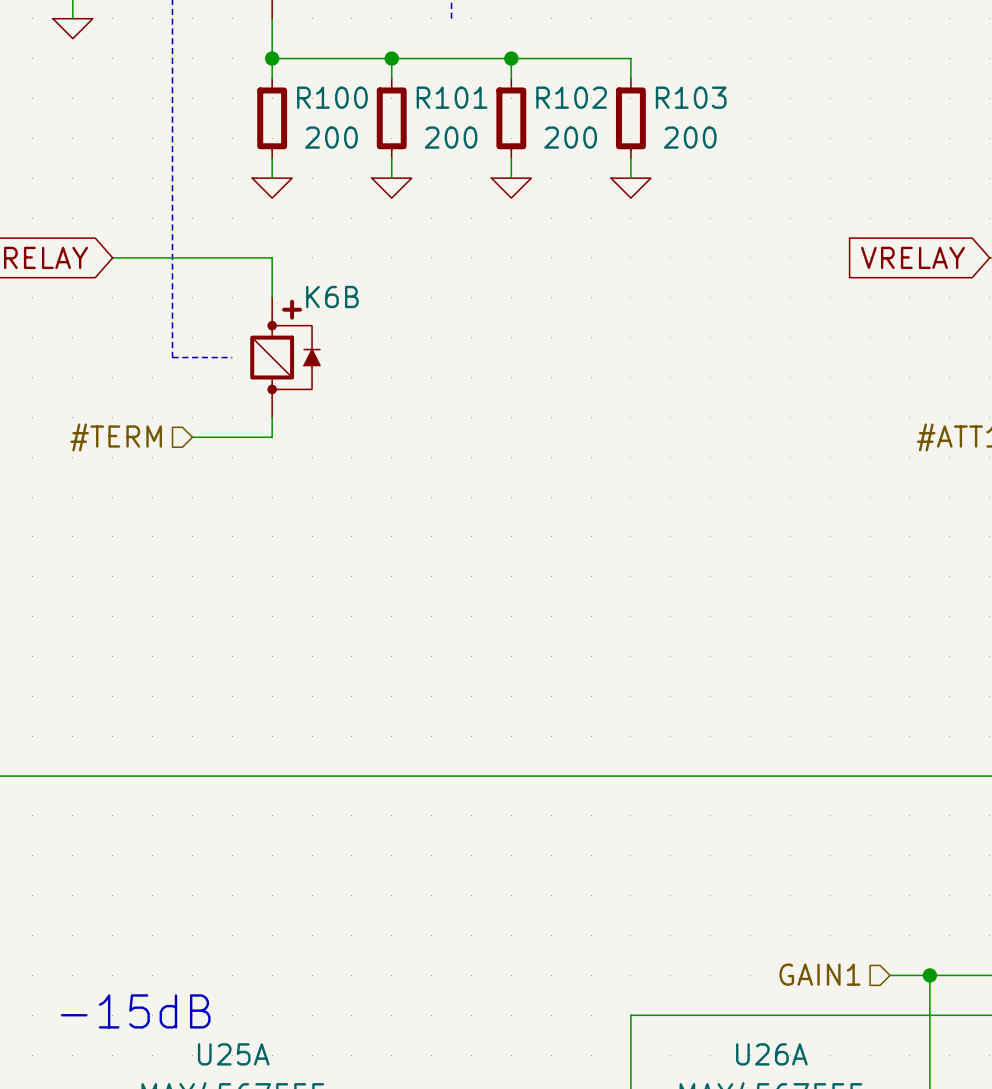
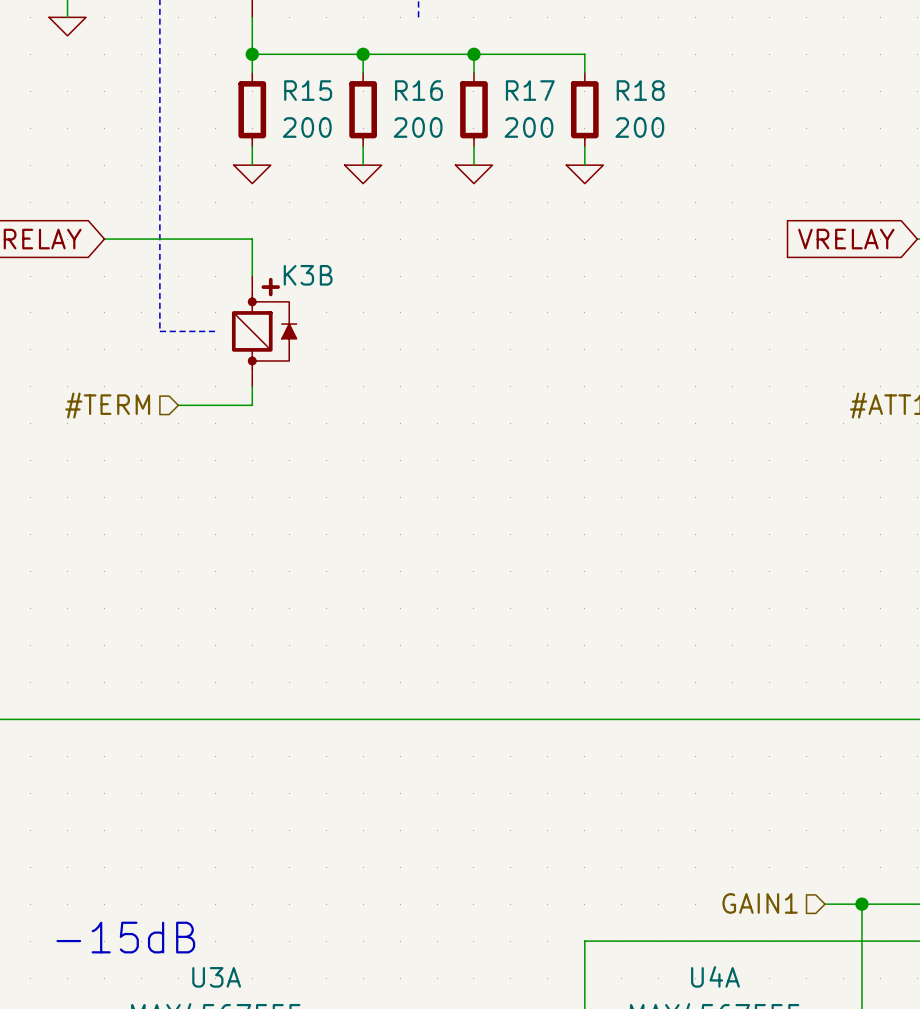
R100 name: R100 (332, 97) -> R15 (308, 90)
R101 name: R101 (452, 97) -> R16 (418, 90)
R102 name: R102 (571, 97) -> R17 (530, 90)
R103 name: R103 (691, 97) -> R18 (640, 90)
K6B name: K6B (332, 297) -> K3B (308, 275)
U25A name: U25A (233, 1054) -> U3A (216, 977)
U26A name: U26A (771, 1054) -> U4A (715, 976)

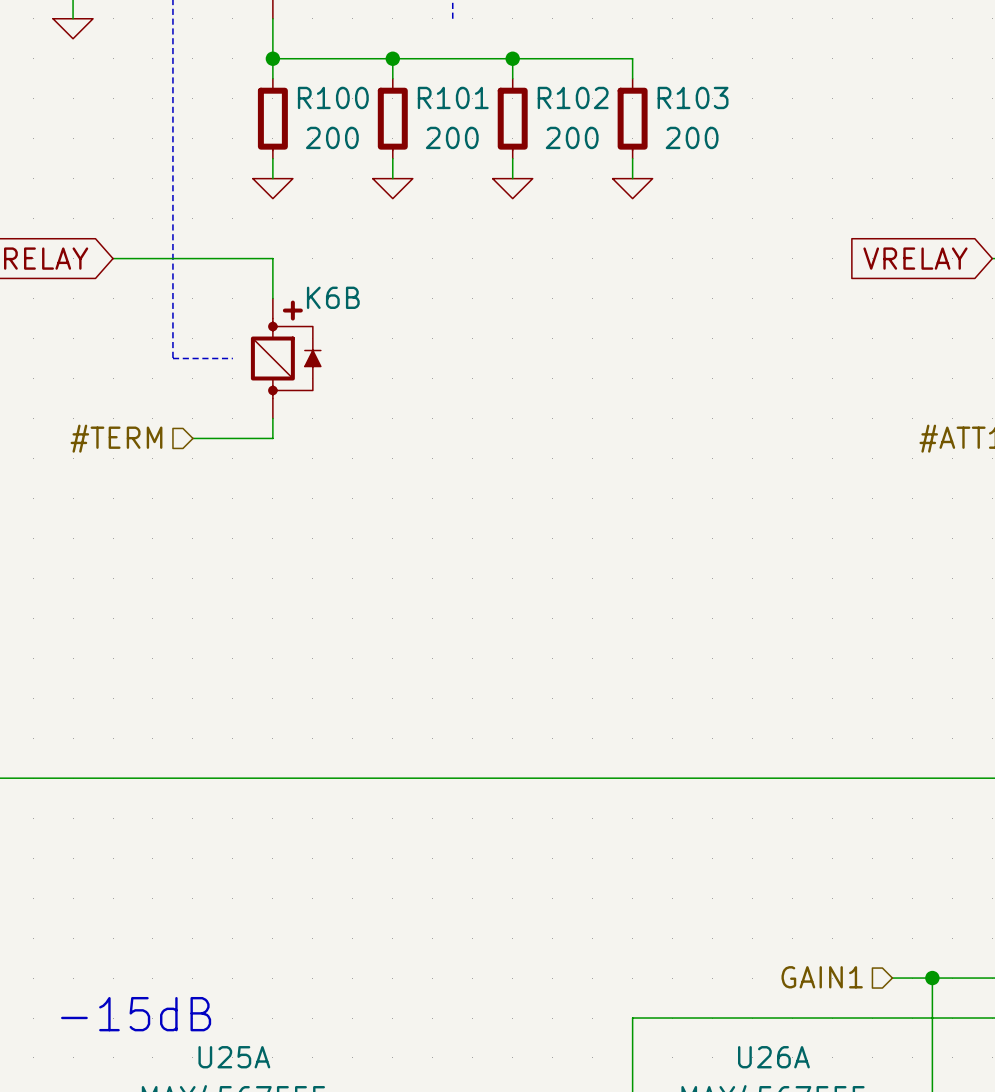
R15 name: R15 (308, 90) -> R100 (333, 97)
R16 name: R16 (418, 90) -> R101 (453, 97)
R17 name: R17 (530, 90) -> R102 (573, 97)
R18 name: R18 (640, 90) -> R103 (693, 97)
K3B name: K3B (308, 275) -> K6B (333, 297)
U4A name: U4A (715, 976) -> U26A (773, 1057)
U3A name: U3A (216, 977) -> U25A (234, 1057)

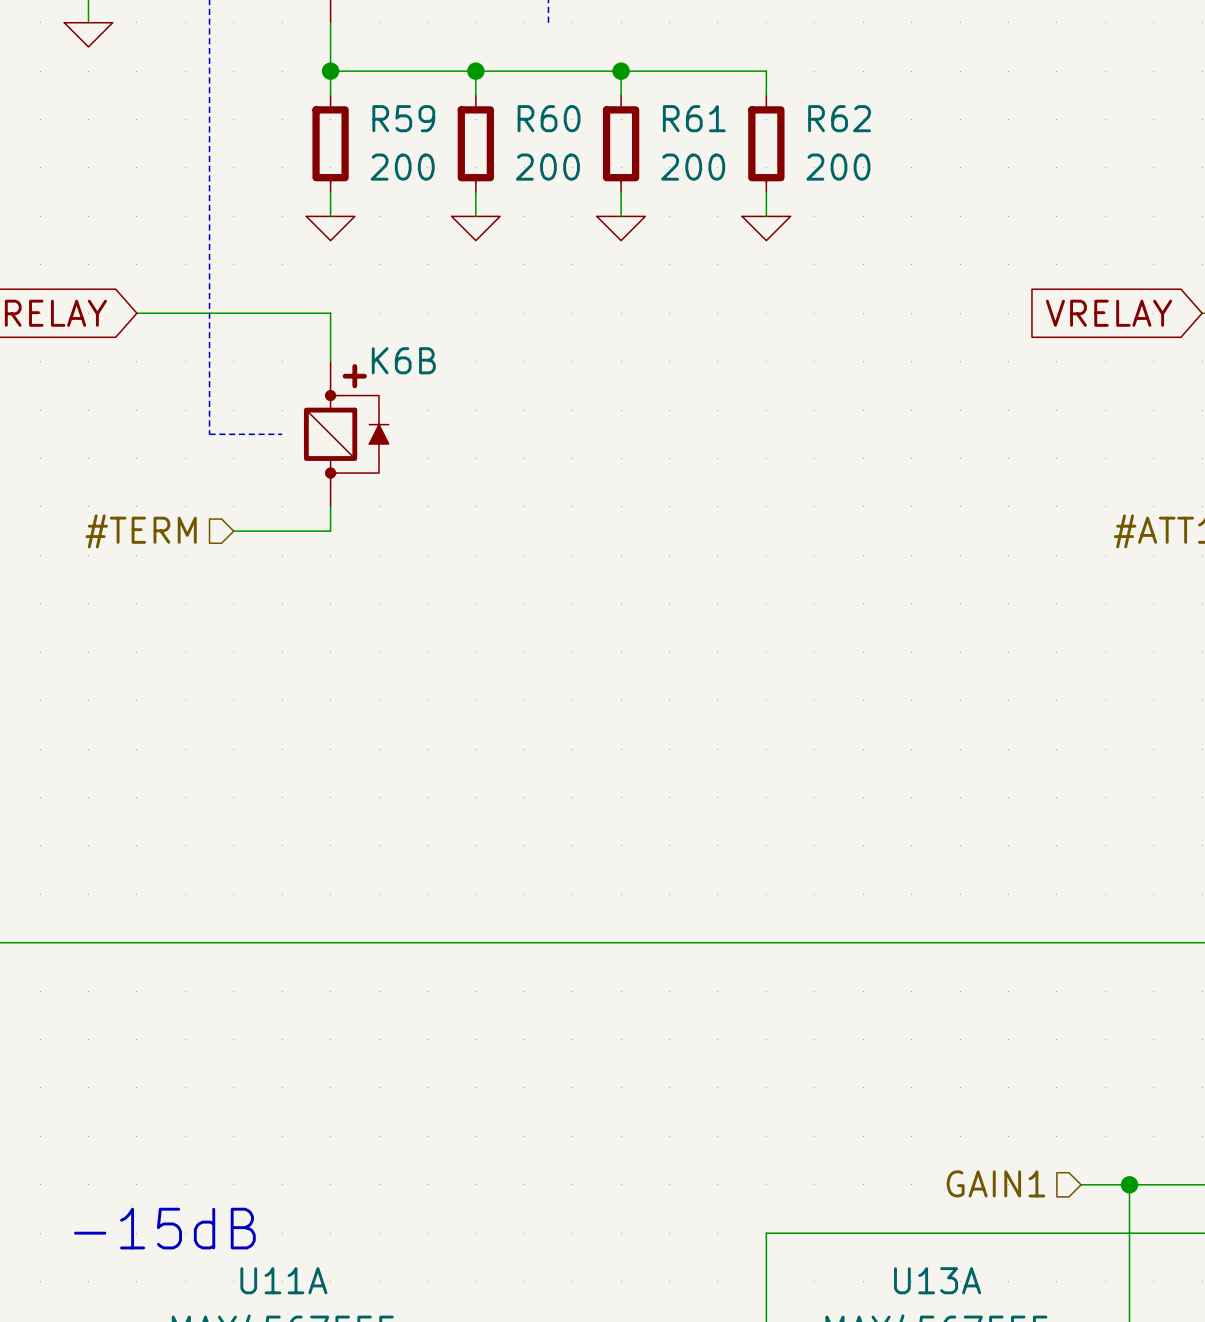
R100 name: R100 (333, 97) -> R59 (403, 118)
R101 name: R101 (453, 97) -> R60 (549, 118)
R102 name: R102 (573, 97) -> R61 (694, 118)
R103 name: R103 (693, 97) -> R62 (839, 118)
U25A name: U25A (234, 1057) -> U11A (283, 1280)
U26A name: U26A (773, 1057) -> U13A (937, 1280)

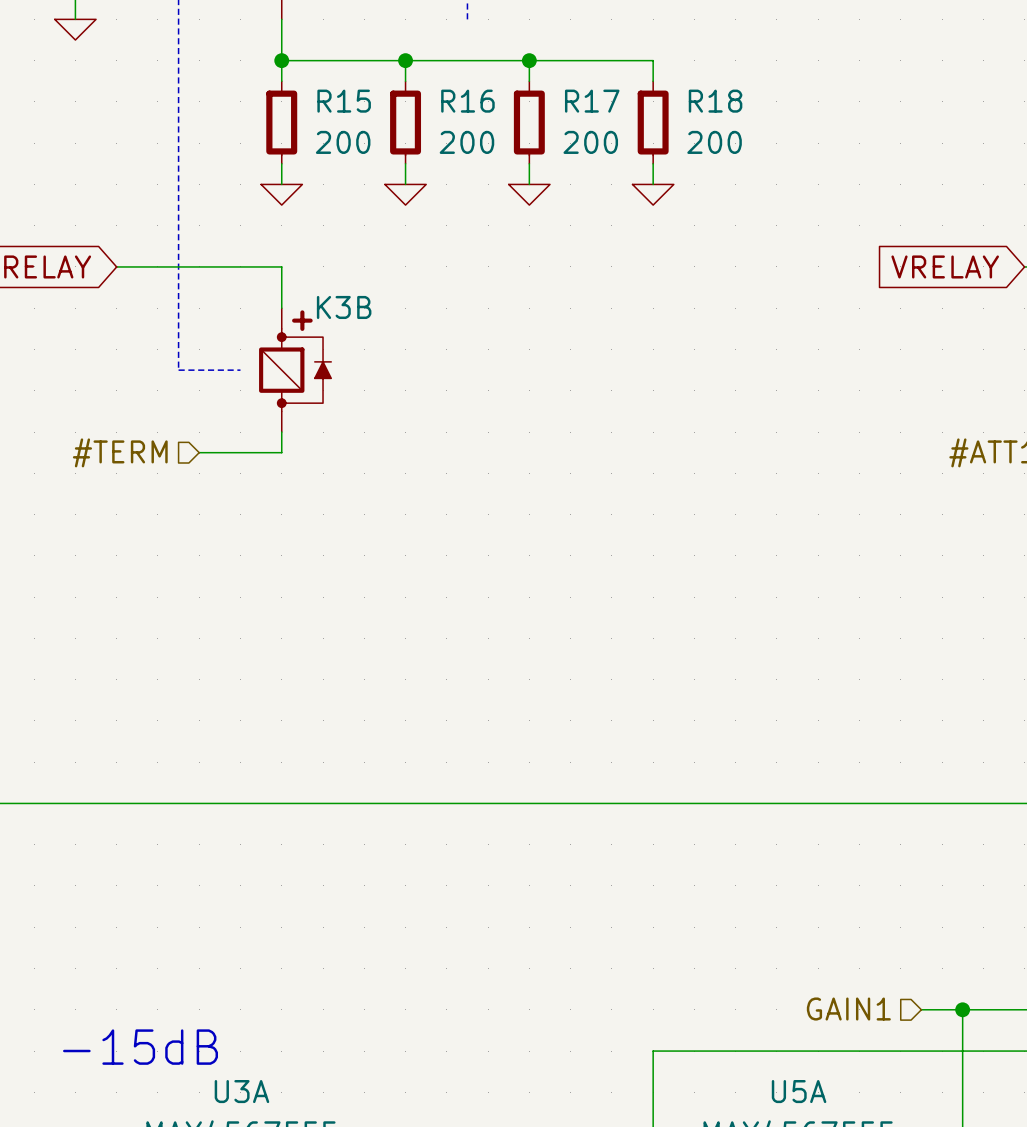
R59 name: R59 (403, 118) -> R15 (344, 101)
R60 name: R60 (549, 118) -> R16 (467, 101)
R61 name: R61 (694, 118) -> R17 (592, 101)
R62 name: R62 (839, 118) -> R18 (715, 101)
K6B name: K6B (403, 360) -> K3B (344, 307)
U11A name: U11A (283, 1280) -> U3A (241, 1091)
U13A name: U13A (937, 1280) -> U5A (799, 1091)

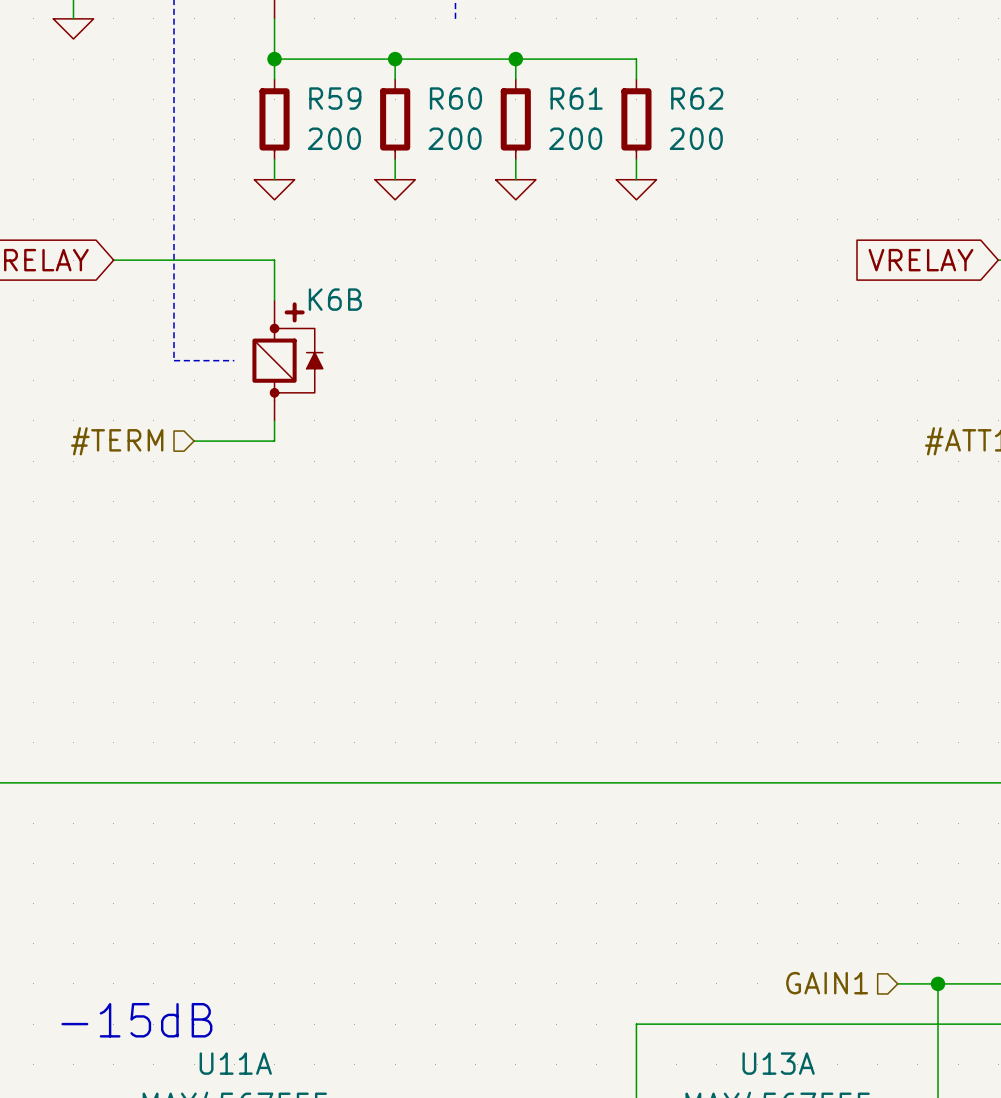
R15 name: R15 (344, 101) -> R59 (335, 98)
R16 name: R16 (467, 101) -> R60 (455, 98)
R17 name: R17 (592, 101) -> R61 (576, 98)
R18 name: R18 (715, 101) -> R62 (697, 98)
K3B name: K3B (344, 307) -> K6B (335, 299)
U3A name: U3A (241, 1091) -> U11A (235, 1063)
U5A name: U5A (799, 1091) -> U13A (778, 1063)

